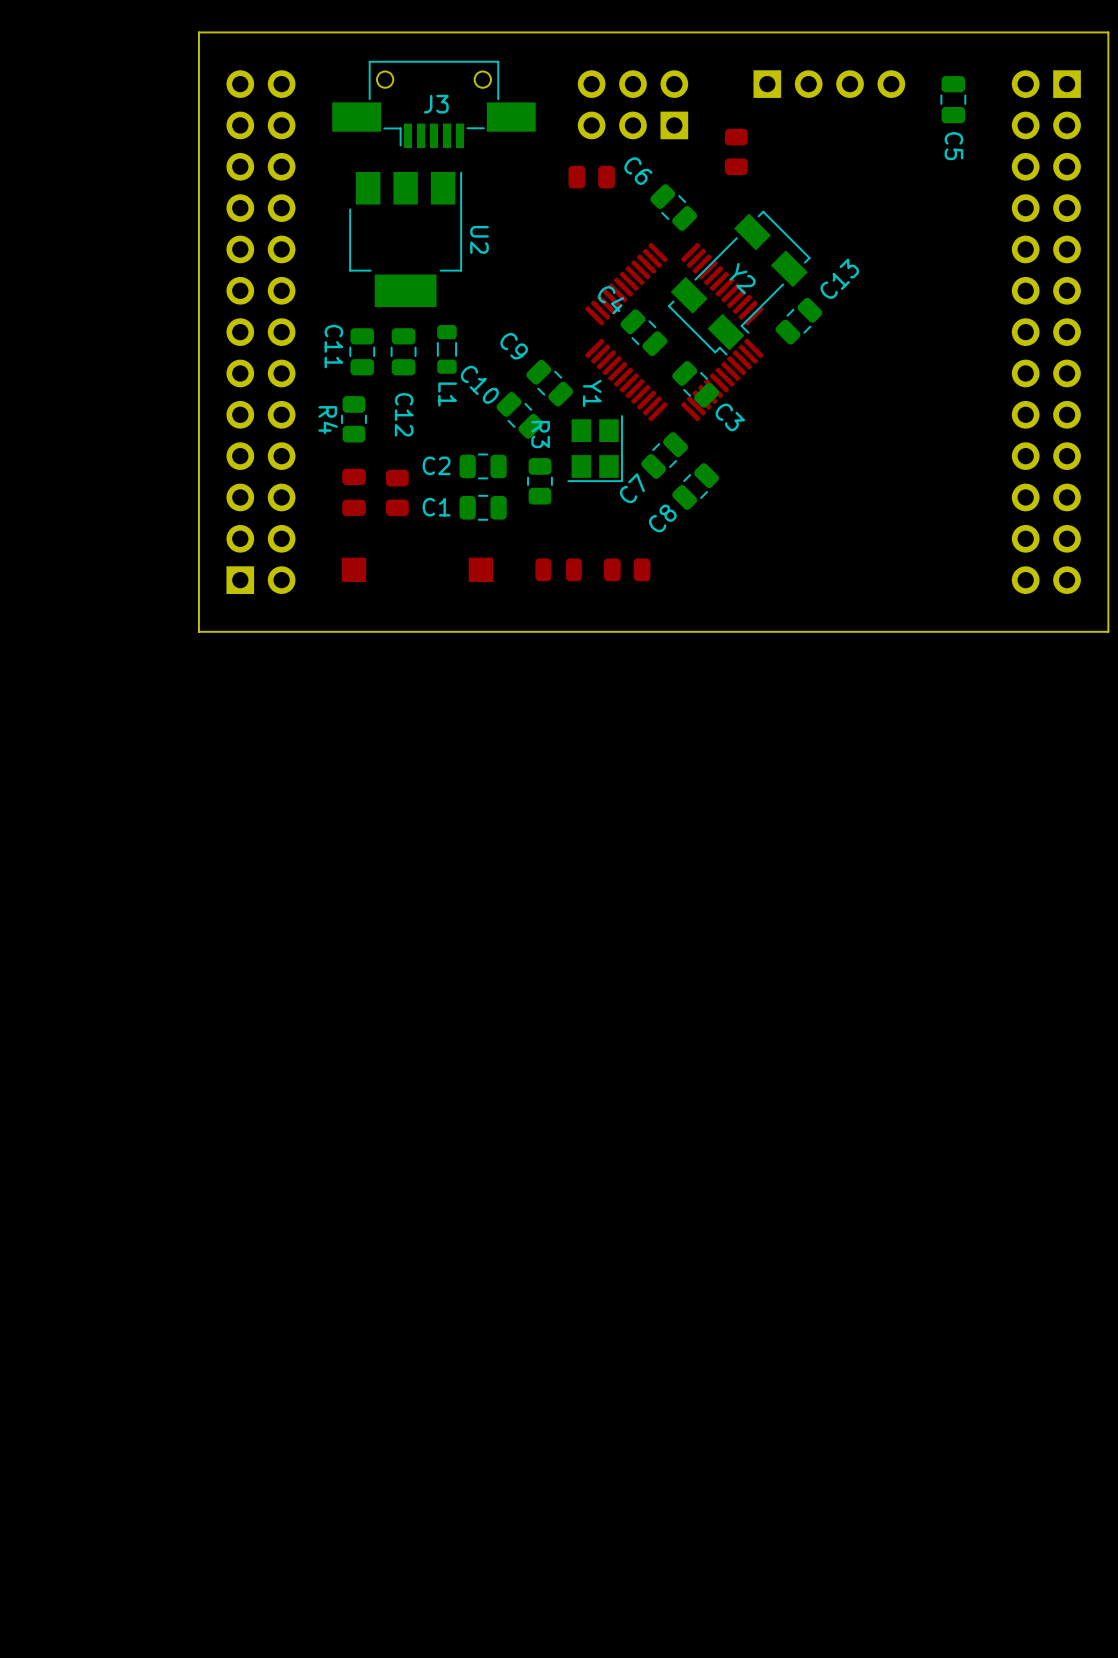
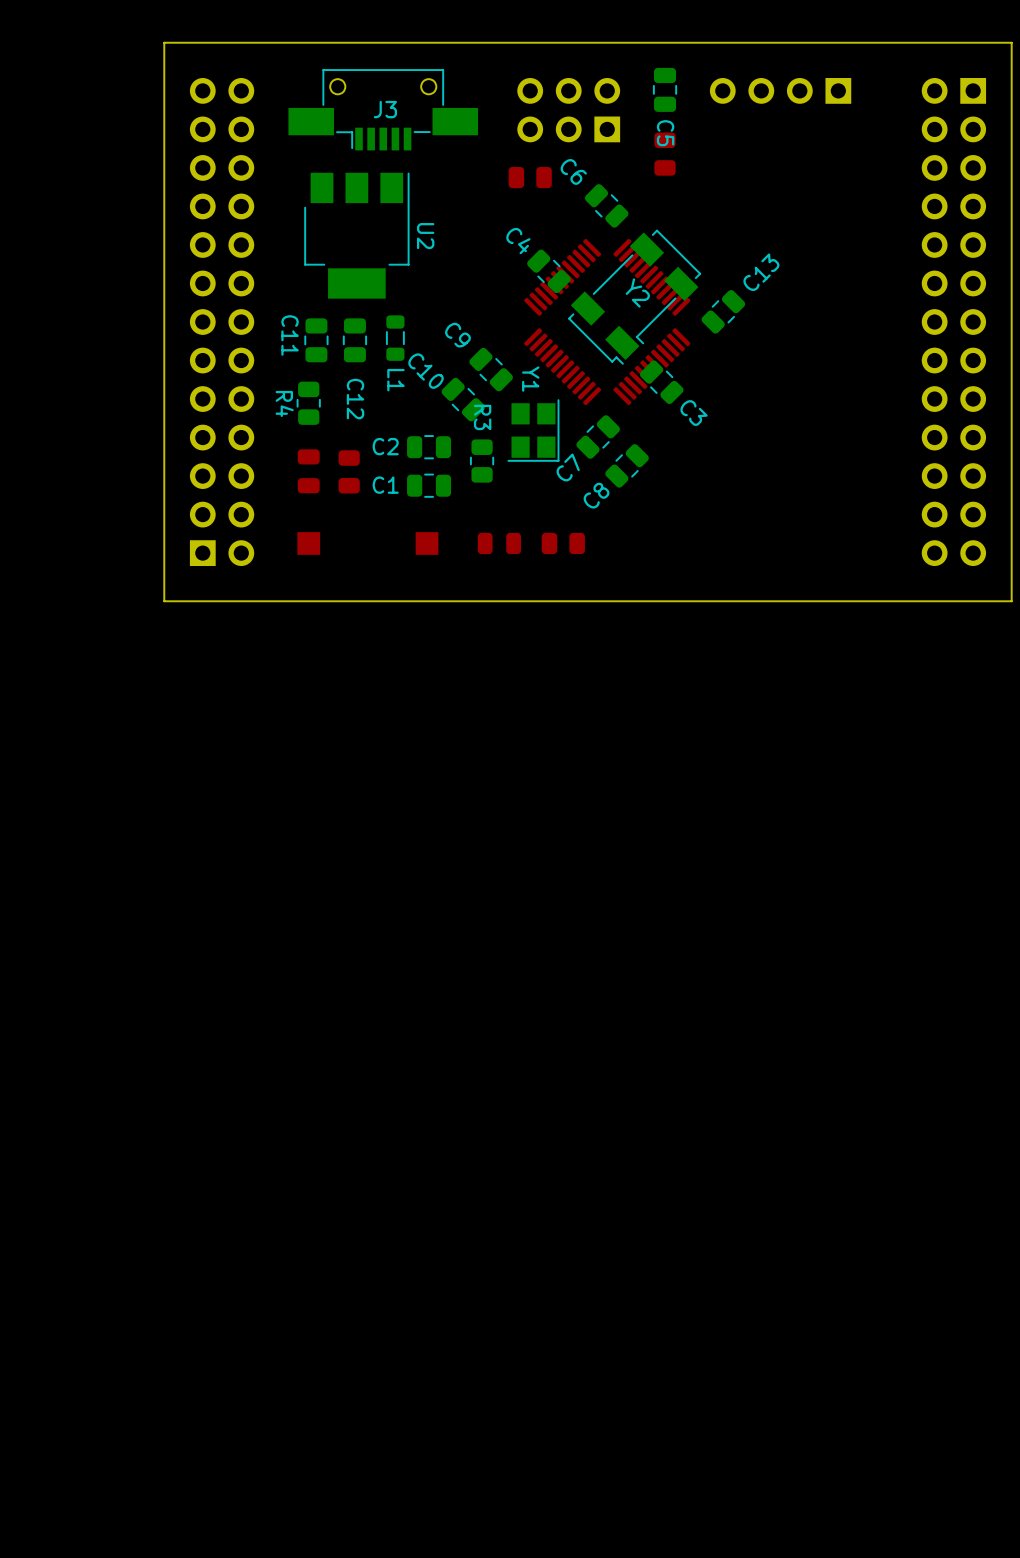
part rotation: 0° (829, 84) -> 180° (780, 90)
C5 position: (953, 99) -> (665, 89)
Y2 position: (739, 283) -> (634, 297)
C4 position: (643, 332) -> (548, 271)
C3 position: (695, 384) -> (661, 382)

